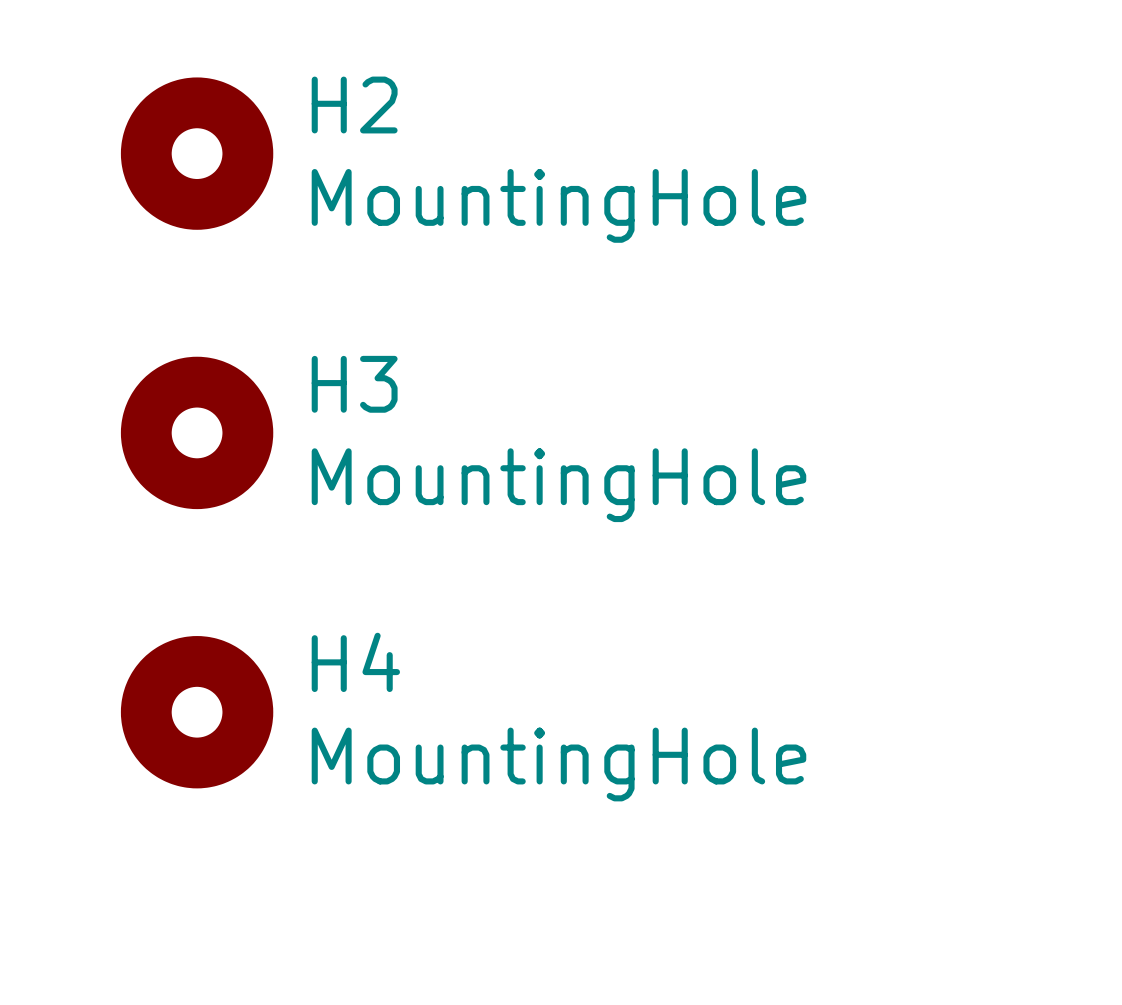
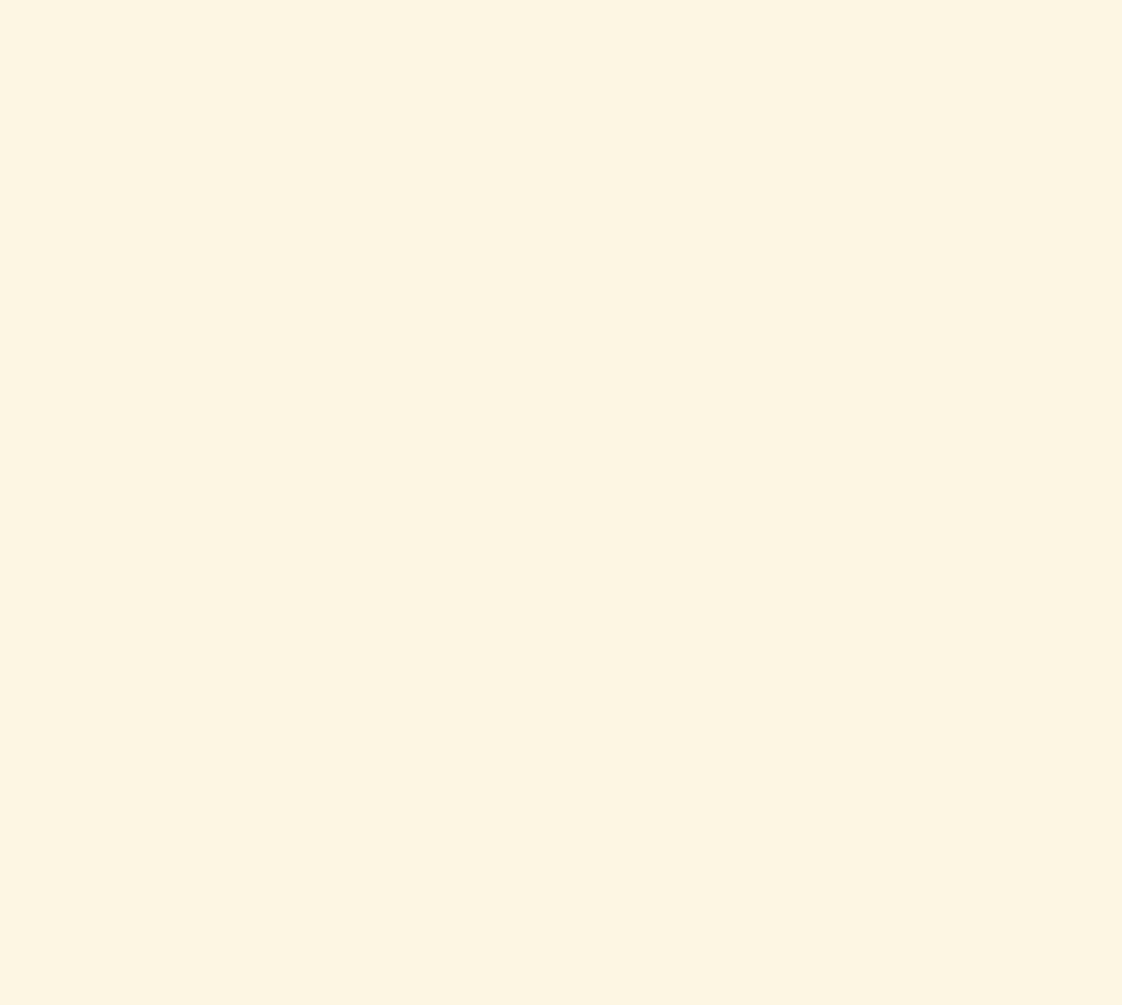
H2: MountingHole (197, 153) -> none
H3: MountingHole (197, 432) -> none
H4: MountingHole (197, 712) -> none

